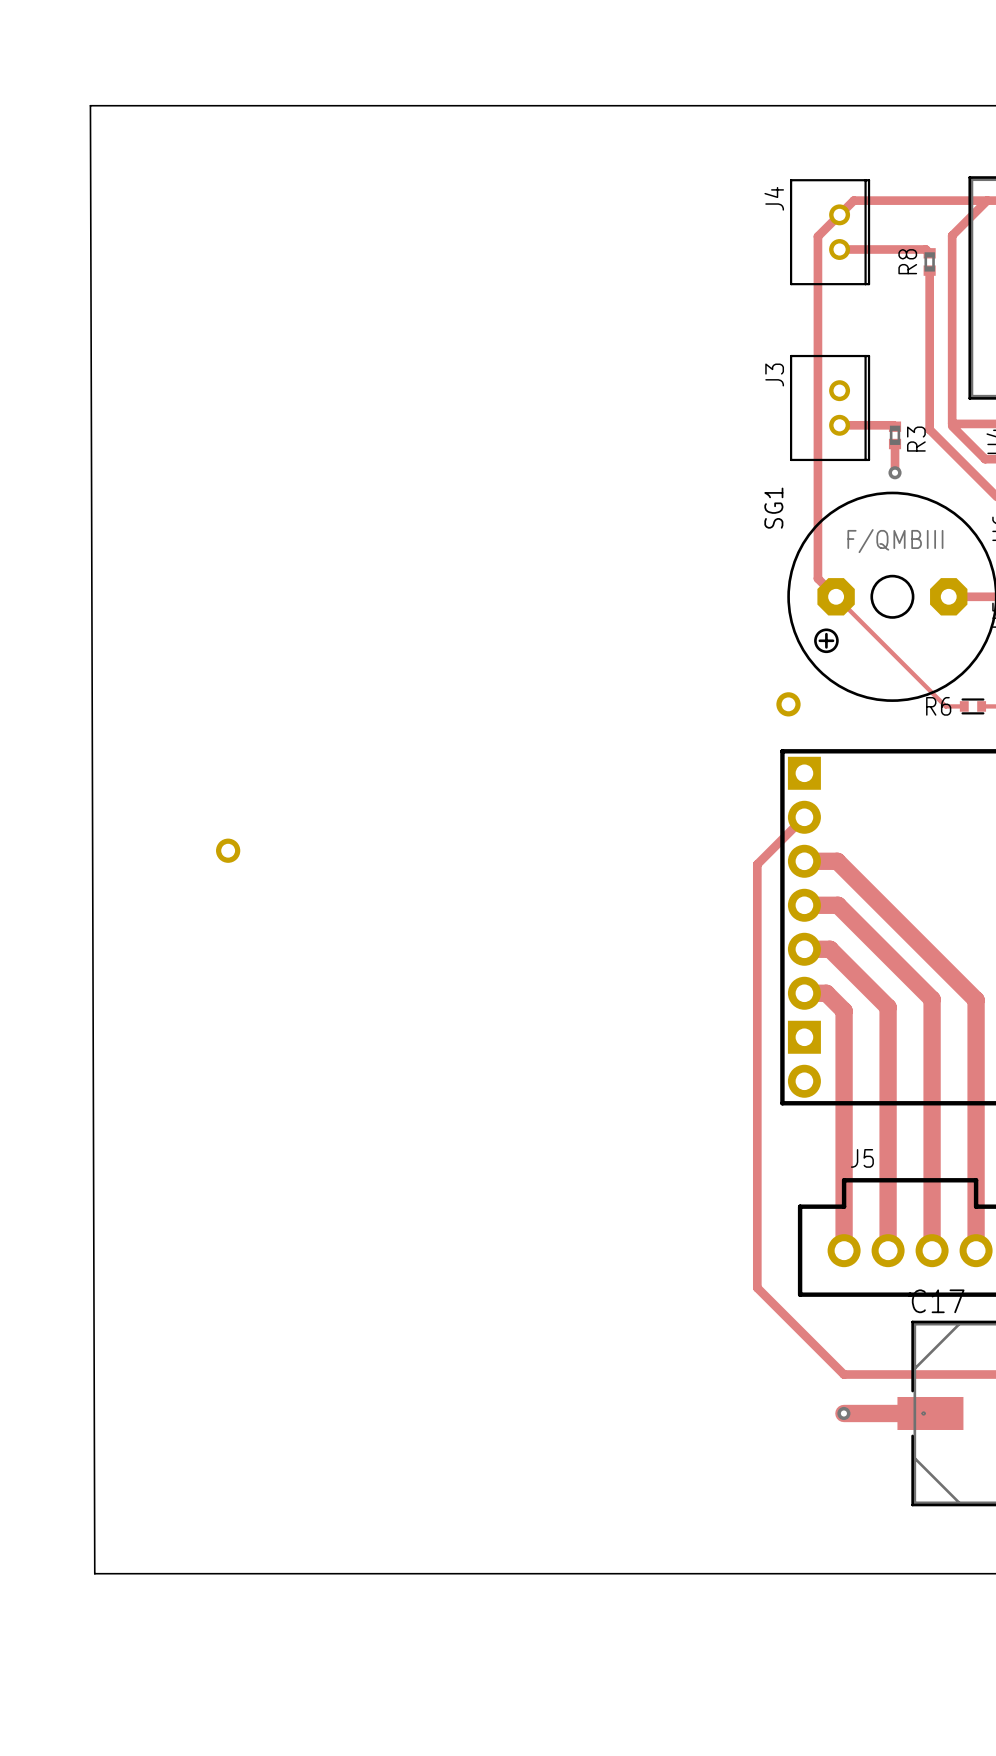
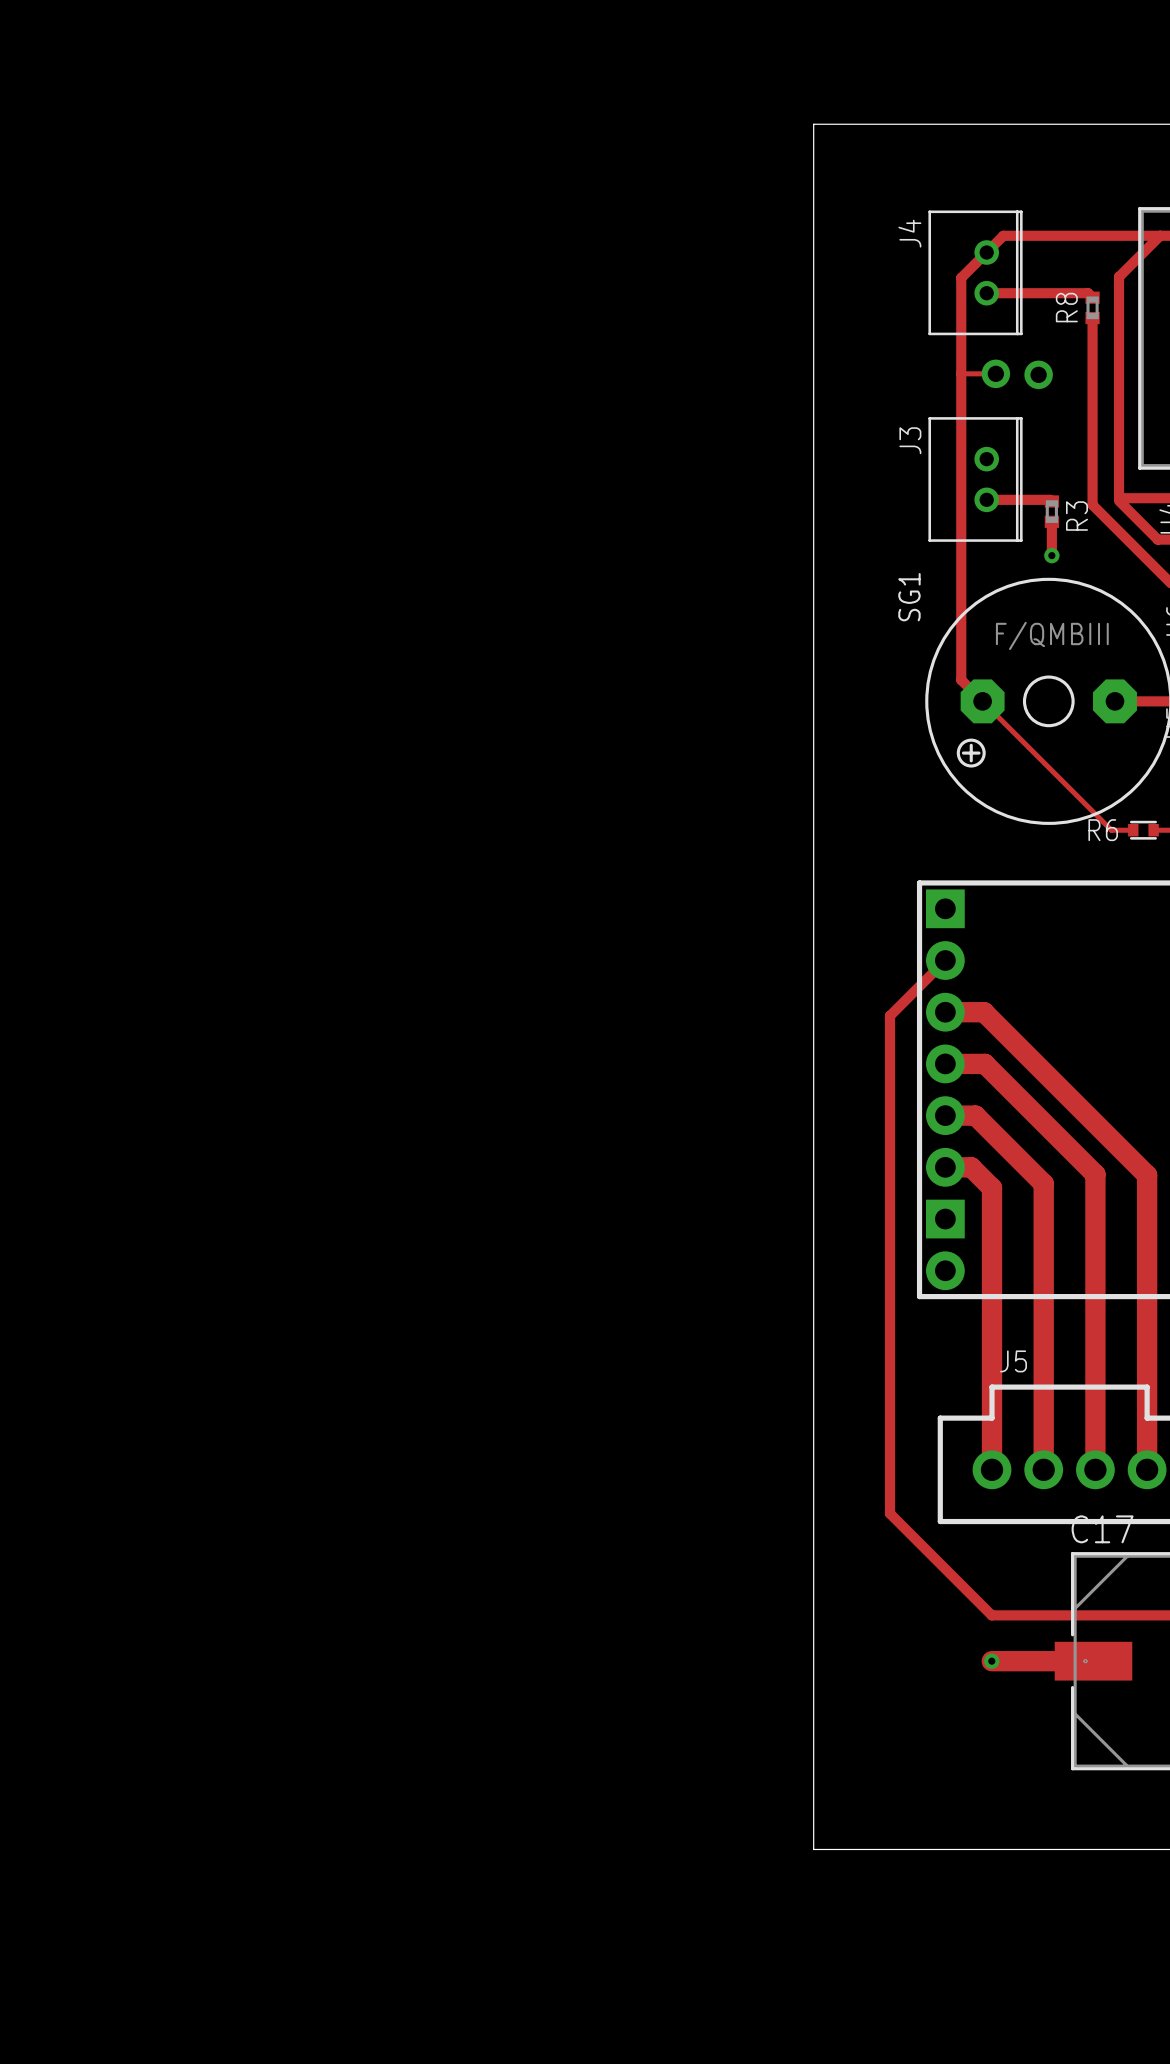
board edge: (692, 105) (90, 105) (94, 1573) (692, 1573) -> (813, 124) (813, 1849)
track: none -> (961, 373) (995, 373)
part: none -> (995, 373)
part: none -> (1038, 374)
part: (788, 704) -> none
part: (228, 850) -> none

